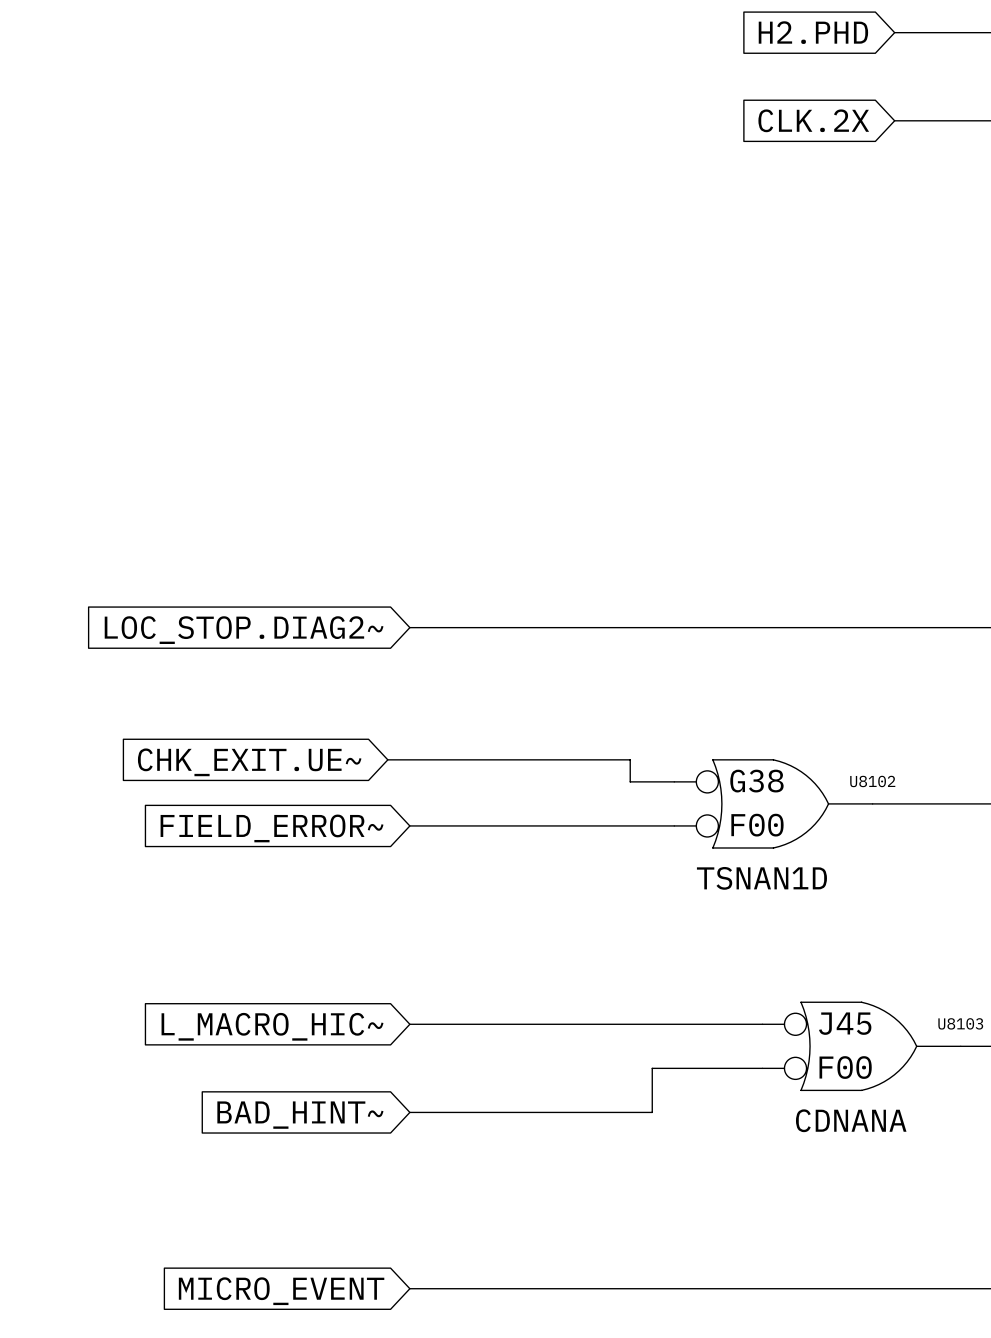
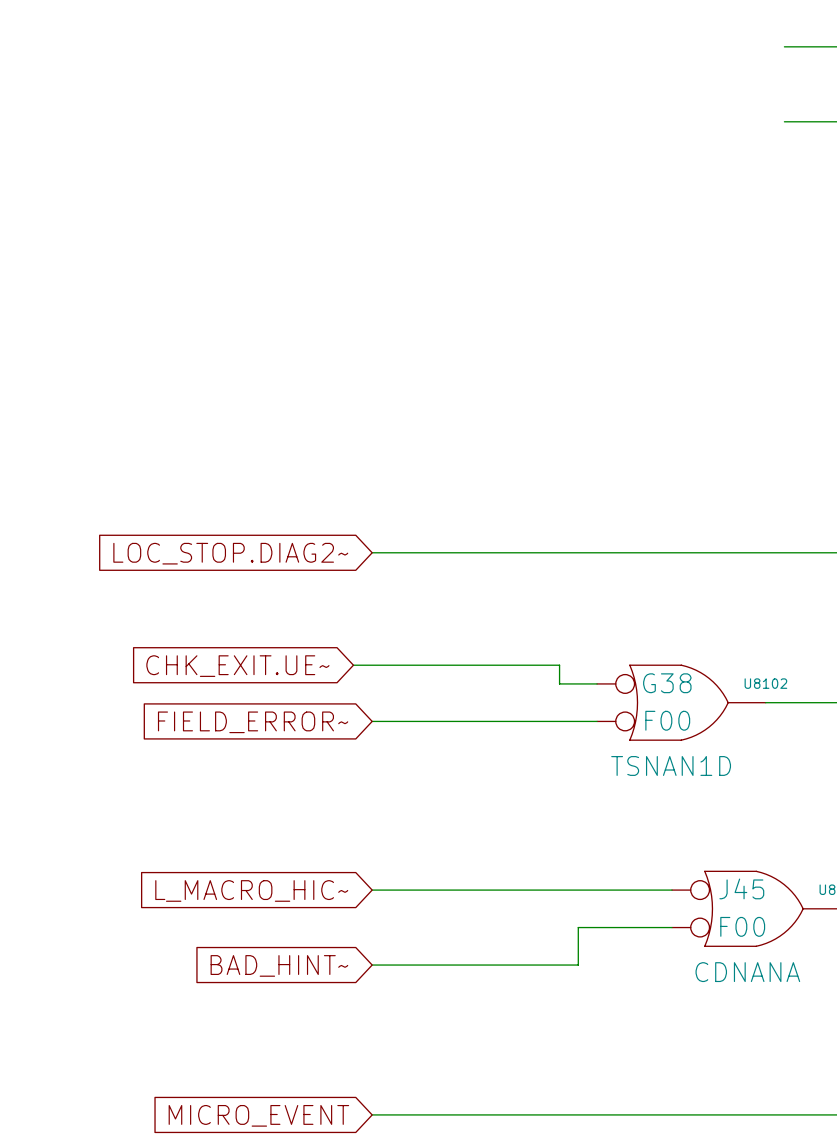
global label: H2.PHD (813, 32) -> none
global label: CLK.2X (813, 120) -> none

